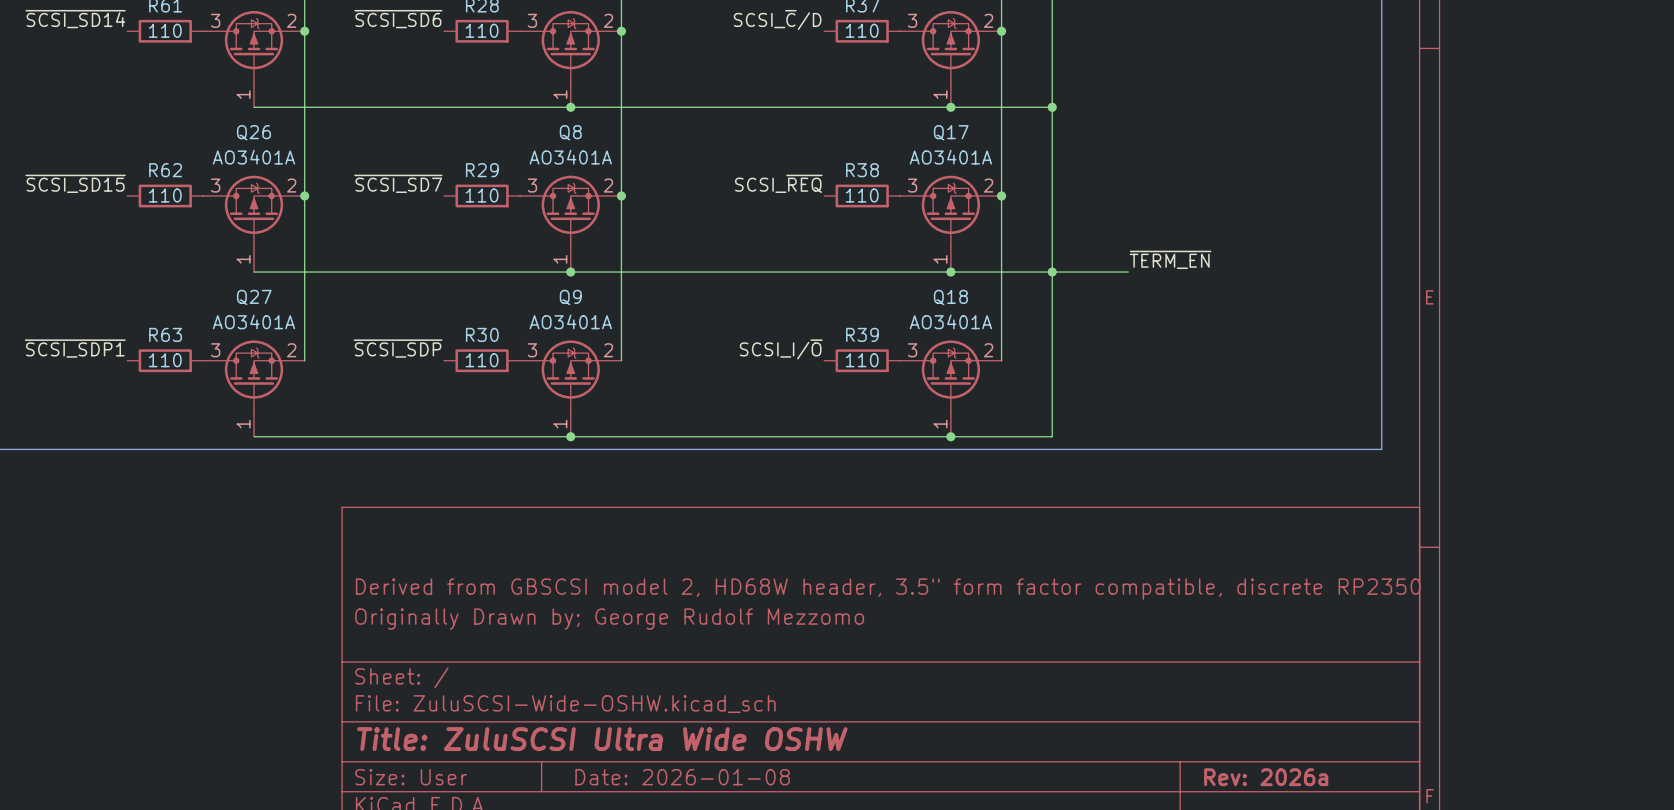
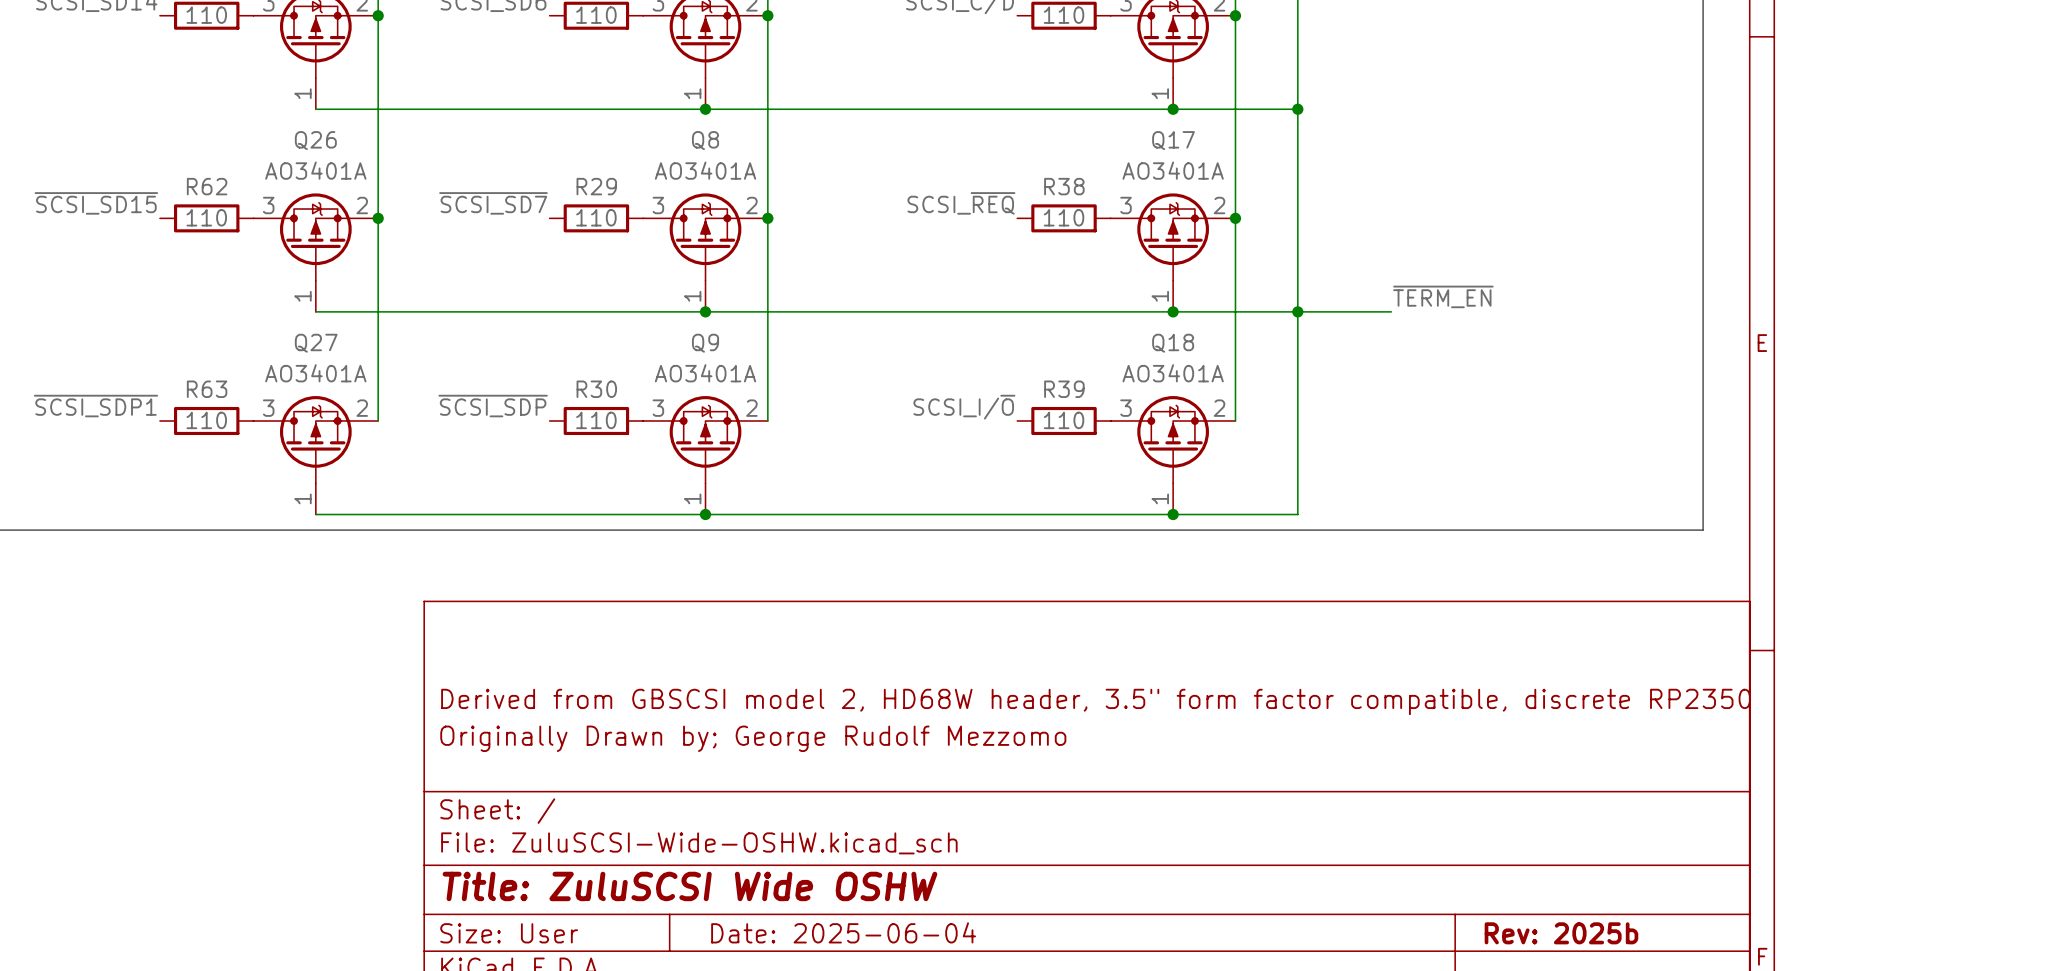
title block: Title: ZuluSCSI Ultra Wide OSHW (602, 739) -> Title: ZuluSCSI Wide OSHW (689, 886)
title block: Date: 2026-01-08 (682, 777) -> Date: 2025-06-04 (843, 932)
title block: Rev: 2026a (1266, 777) -> Rev: 2025b (1561, 933)

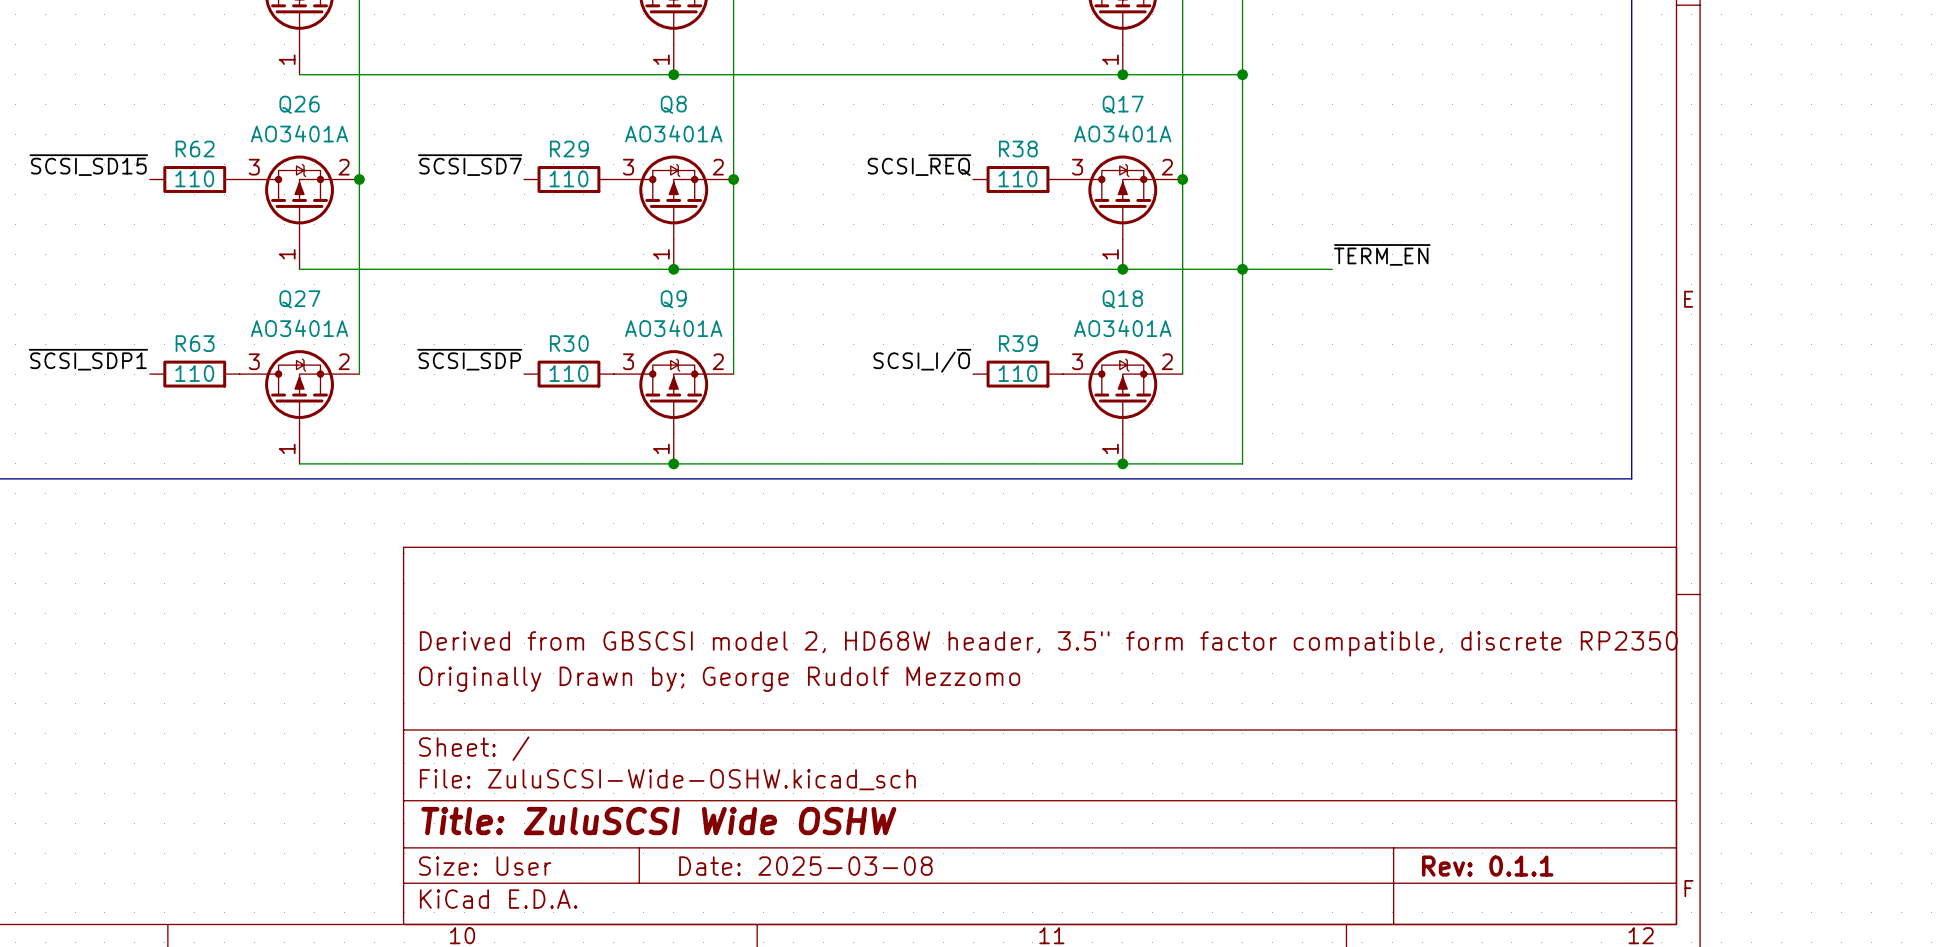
title block: Date: 2025-06-04 (843, 932) -> Date: 2025-03-08 (805, 866)
title block: Rev: 2025b (1561, 933) -> Rev: 0.1.1 (1487, 866)

